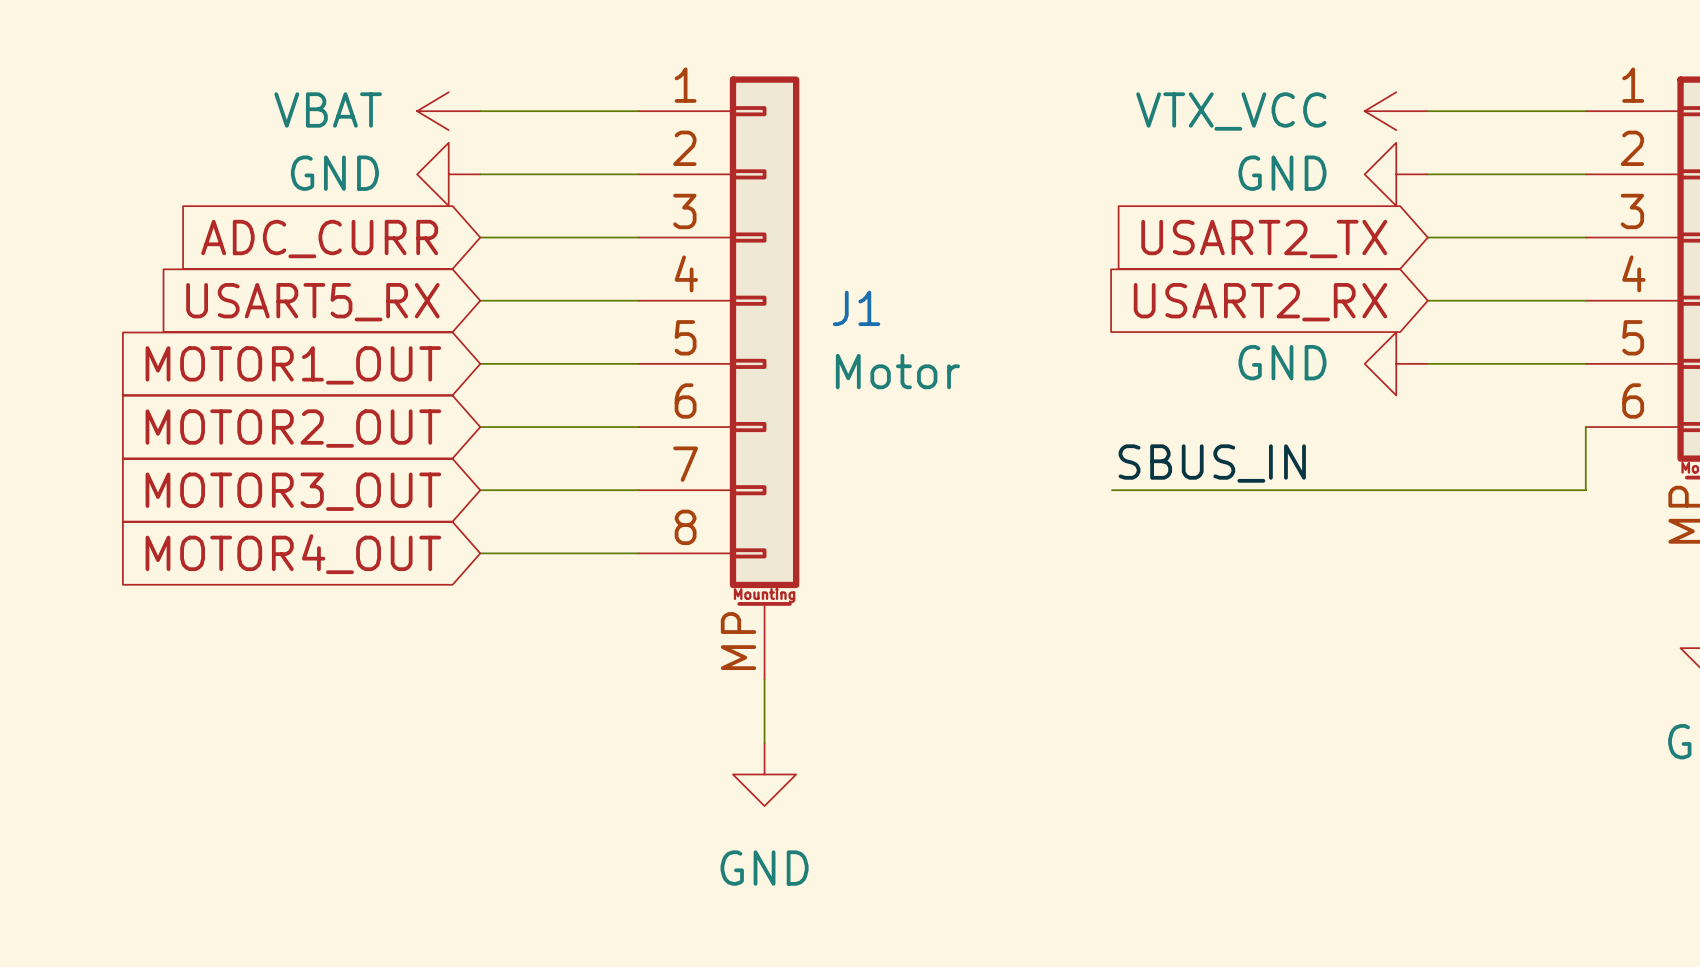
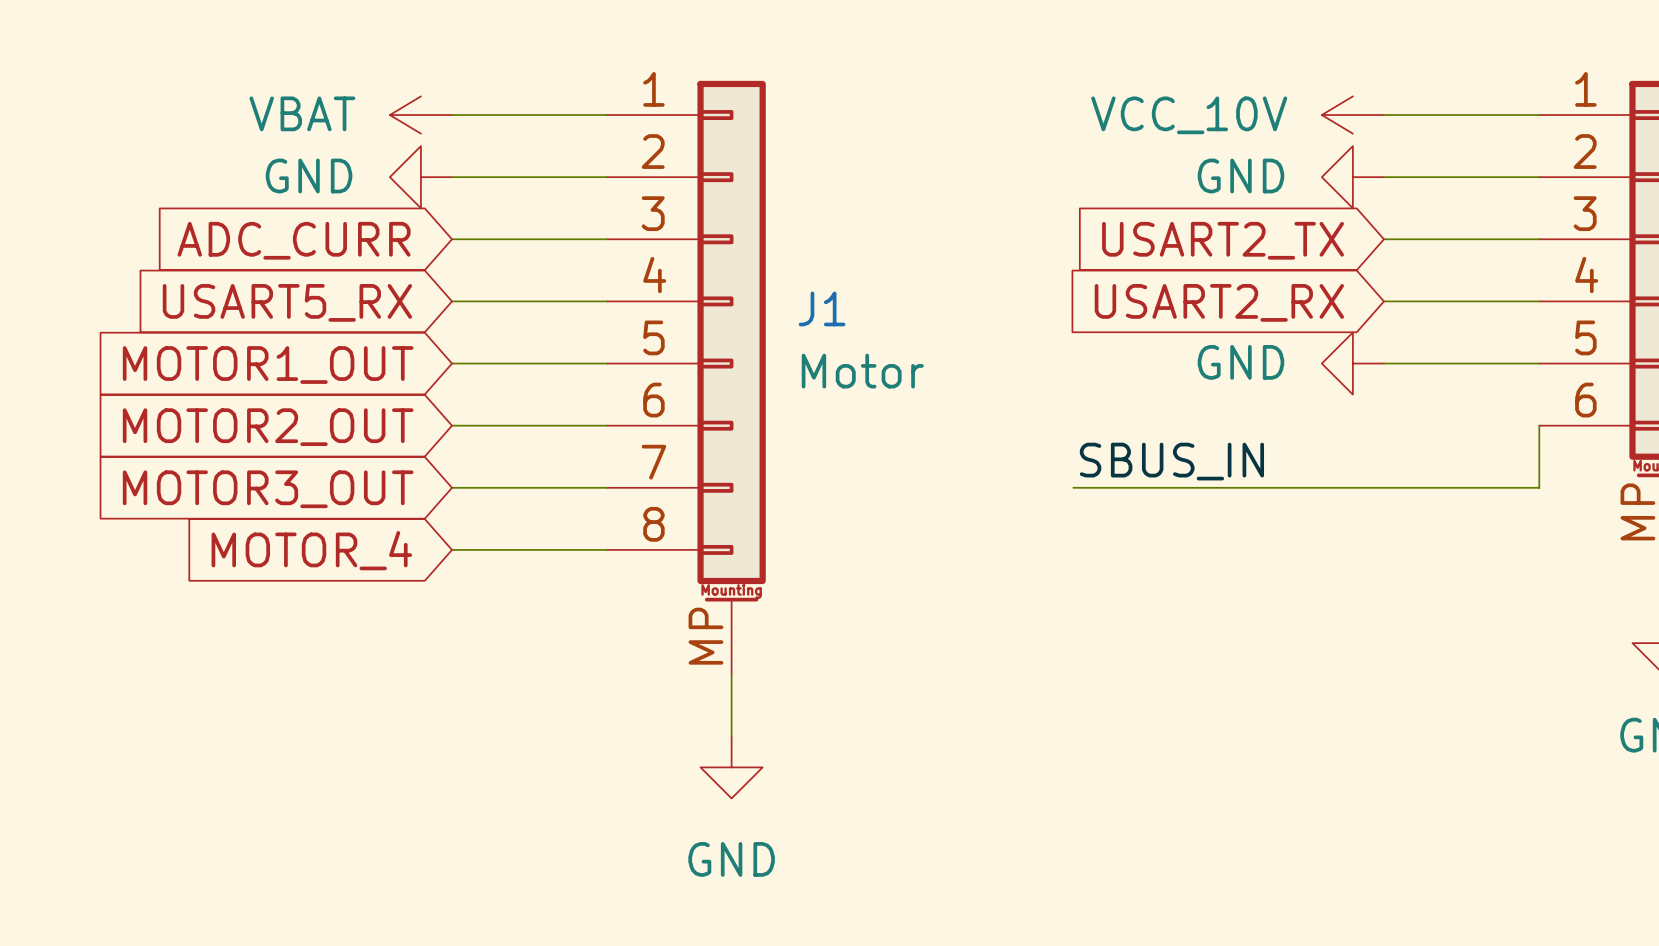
power symbol: VTX_VCC (1396, 111) -> VCC_10V (1352, 115)
global label: MOTOR4_OUT (293, 554) -> MOTOR_4 (311, 550)

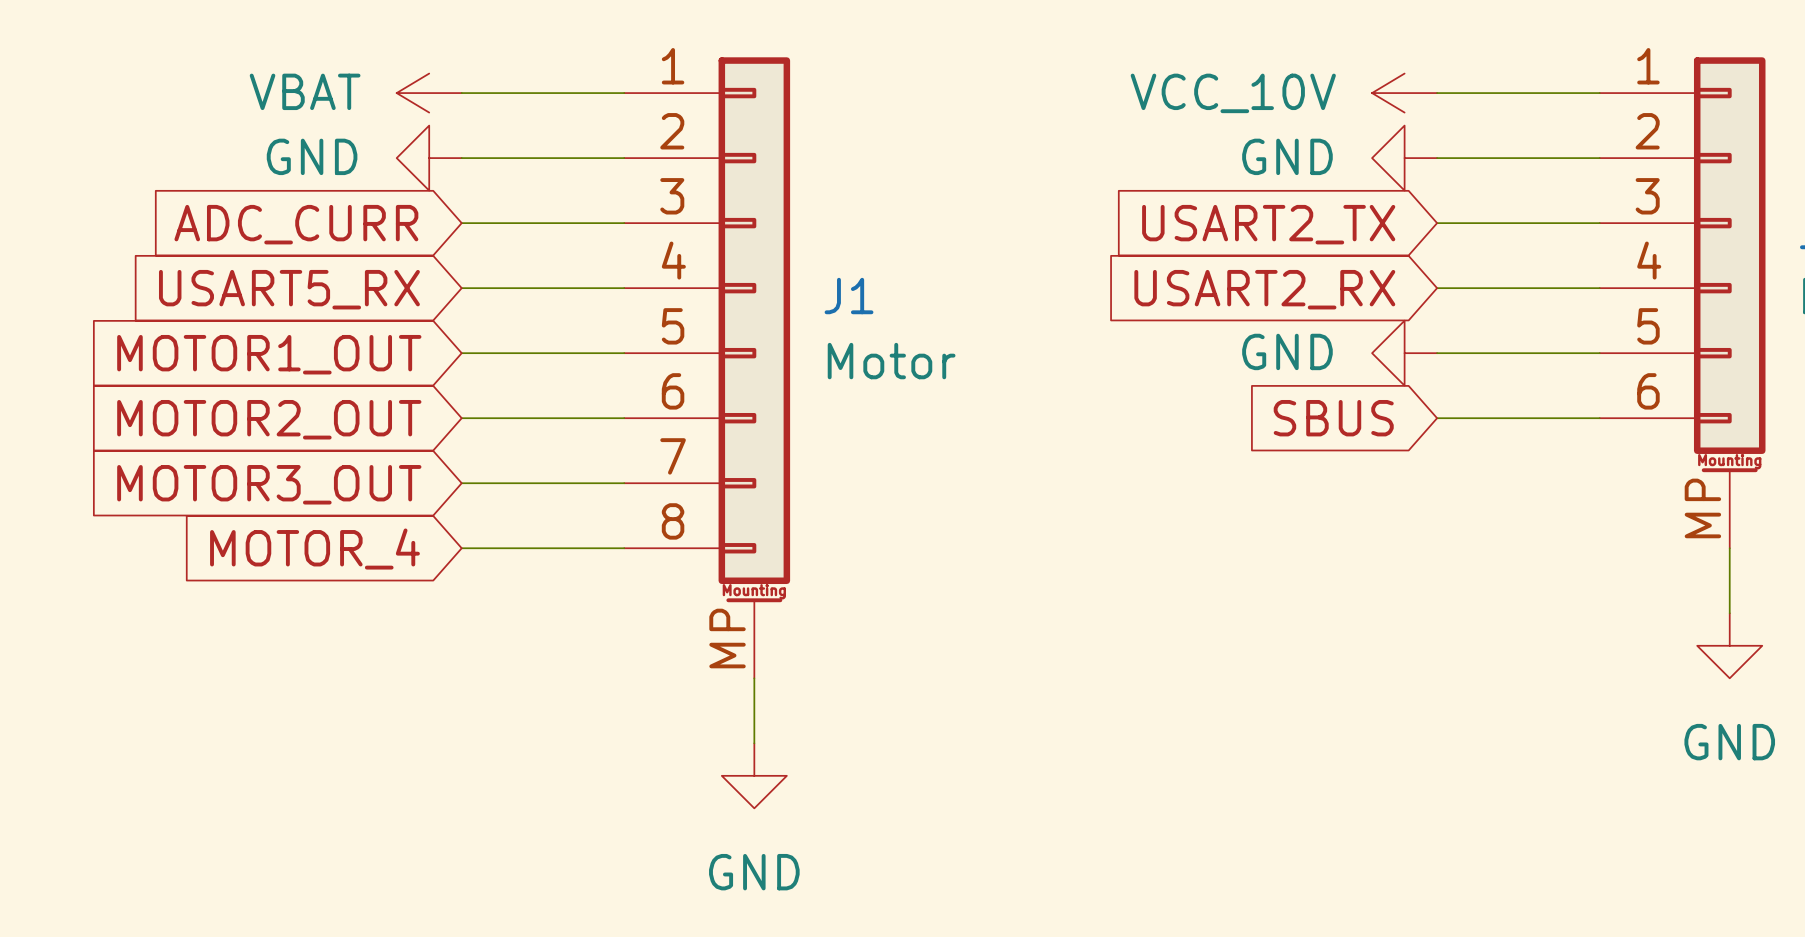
global label: none -> SBUS (1333, 418)
wire: (1539, 425) (1539, 487) (1073, 487) -> (1599, 418) (1437, 418)
label: SBUS_IN (1171, 461) -> none

